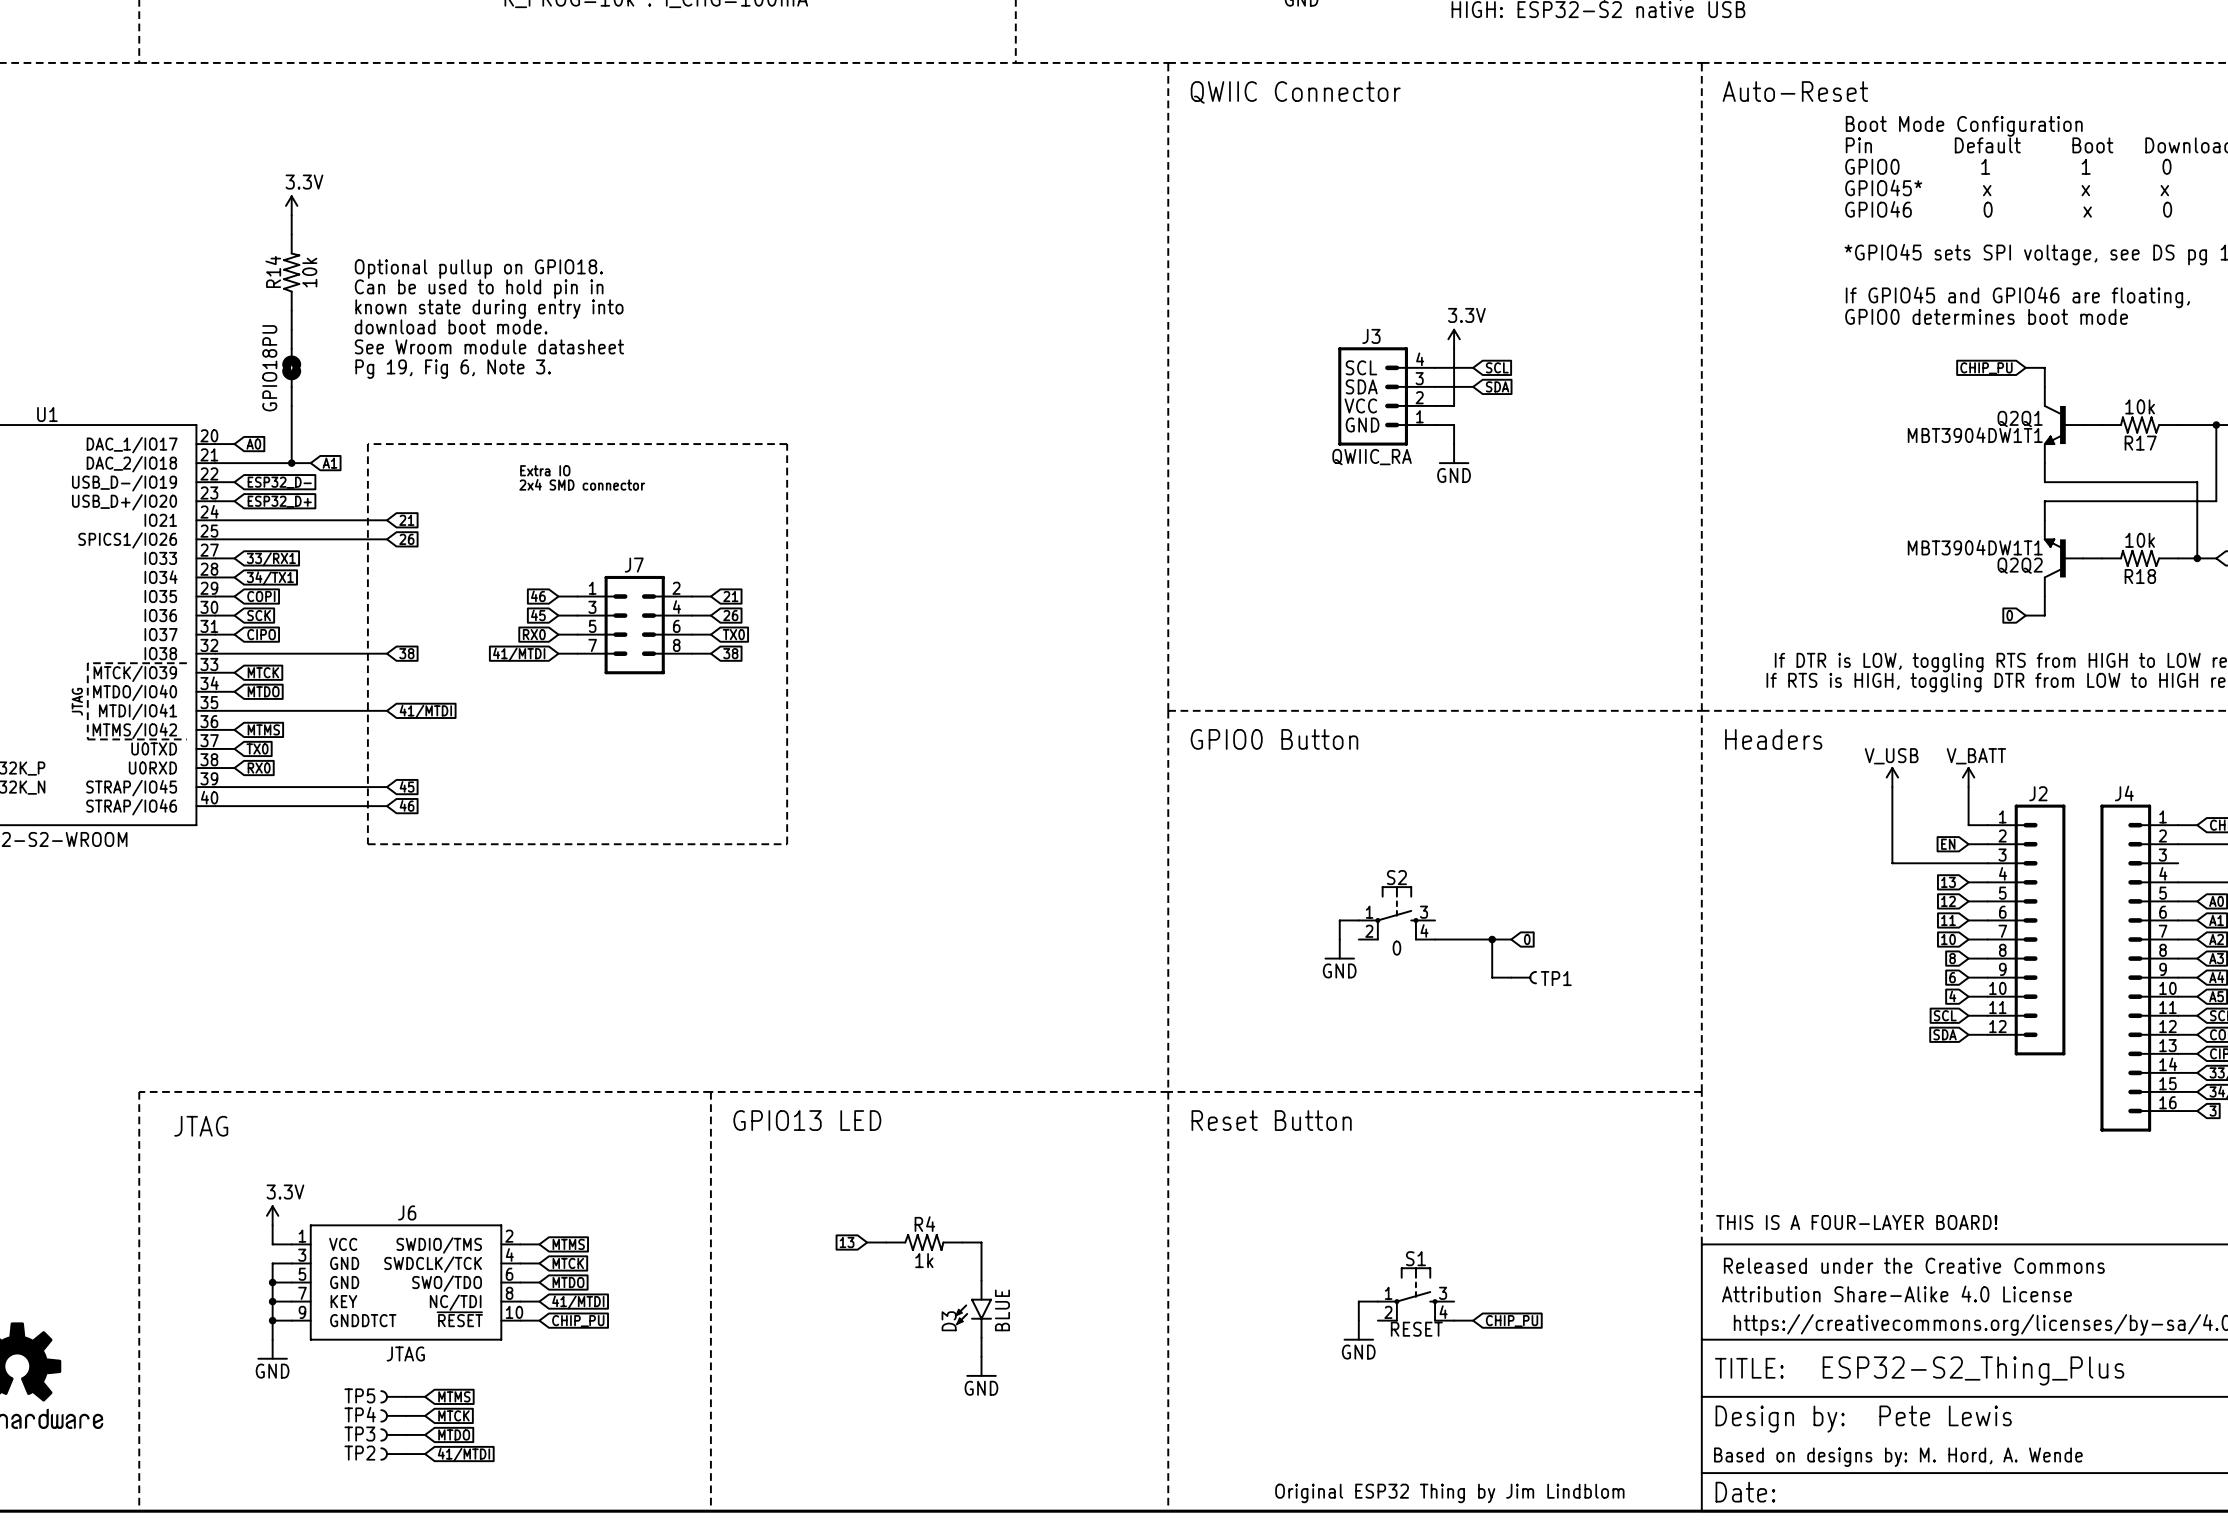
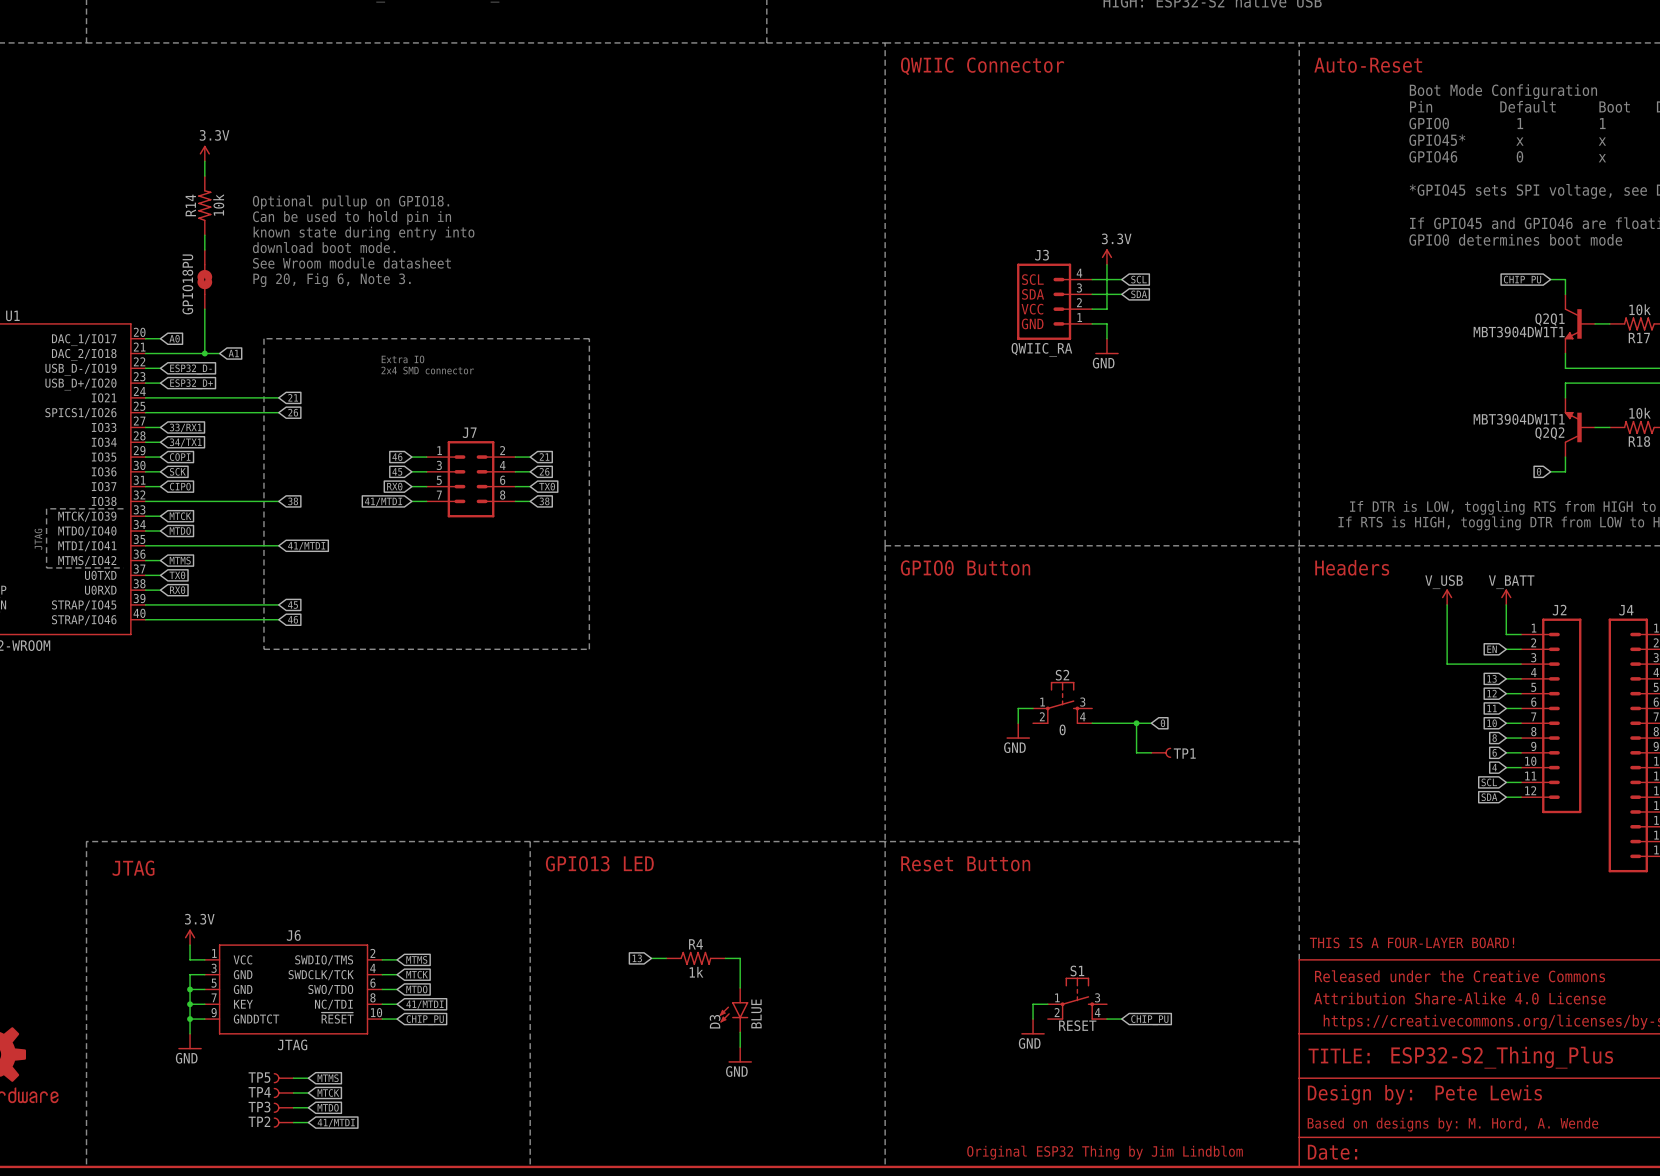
text: Pg 19, Fig 6, Note 3. (453, 369) -> Pg 20, Fig 6, Note 3. (332, 280)

